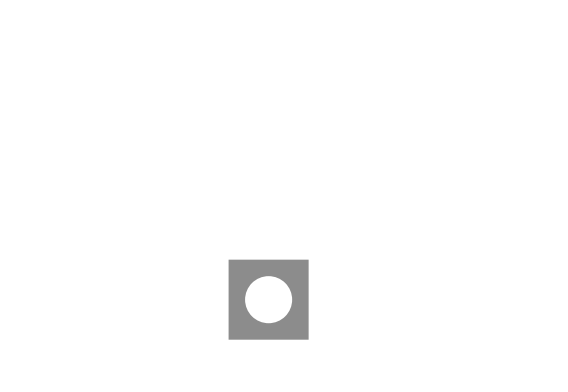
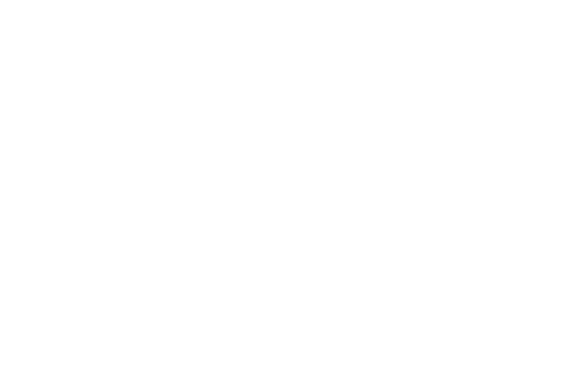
part: (268, 299) -> none

